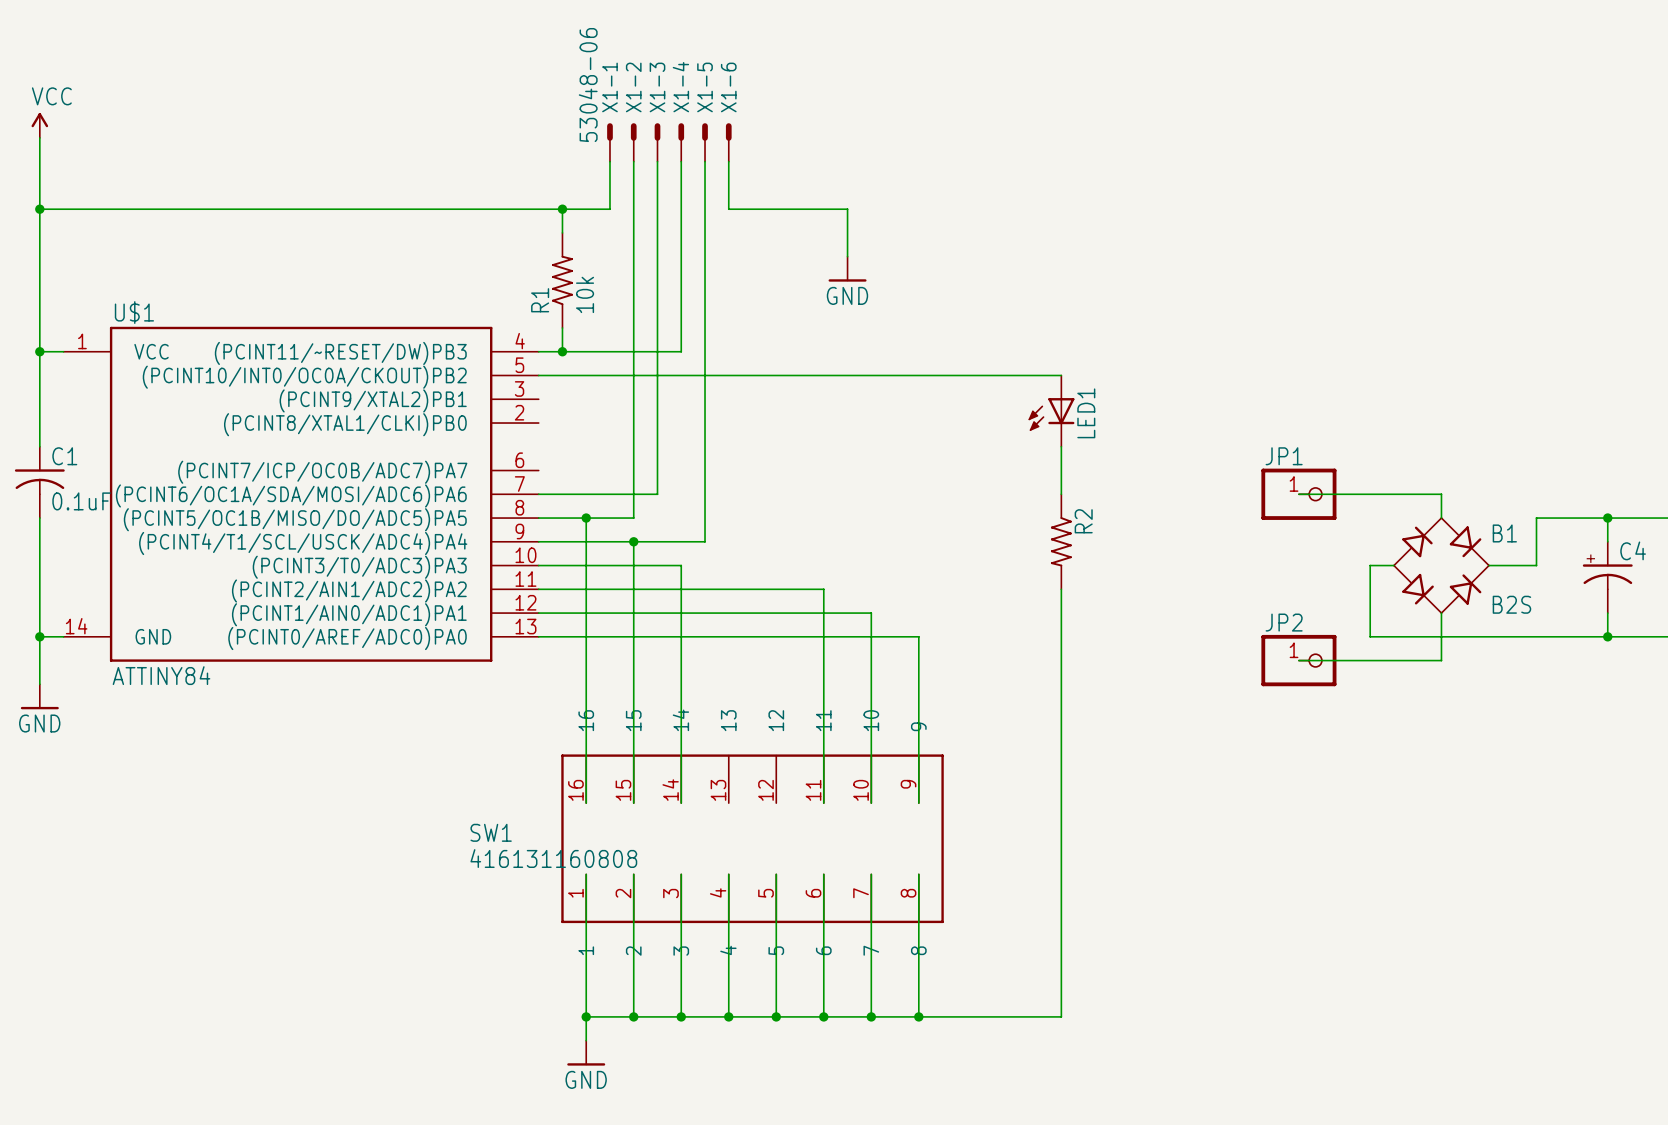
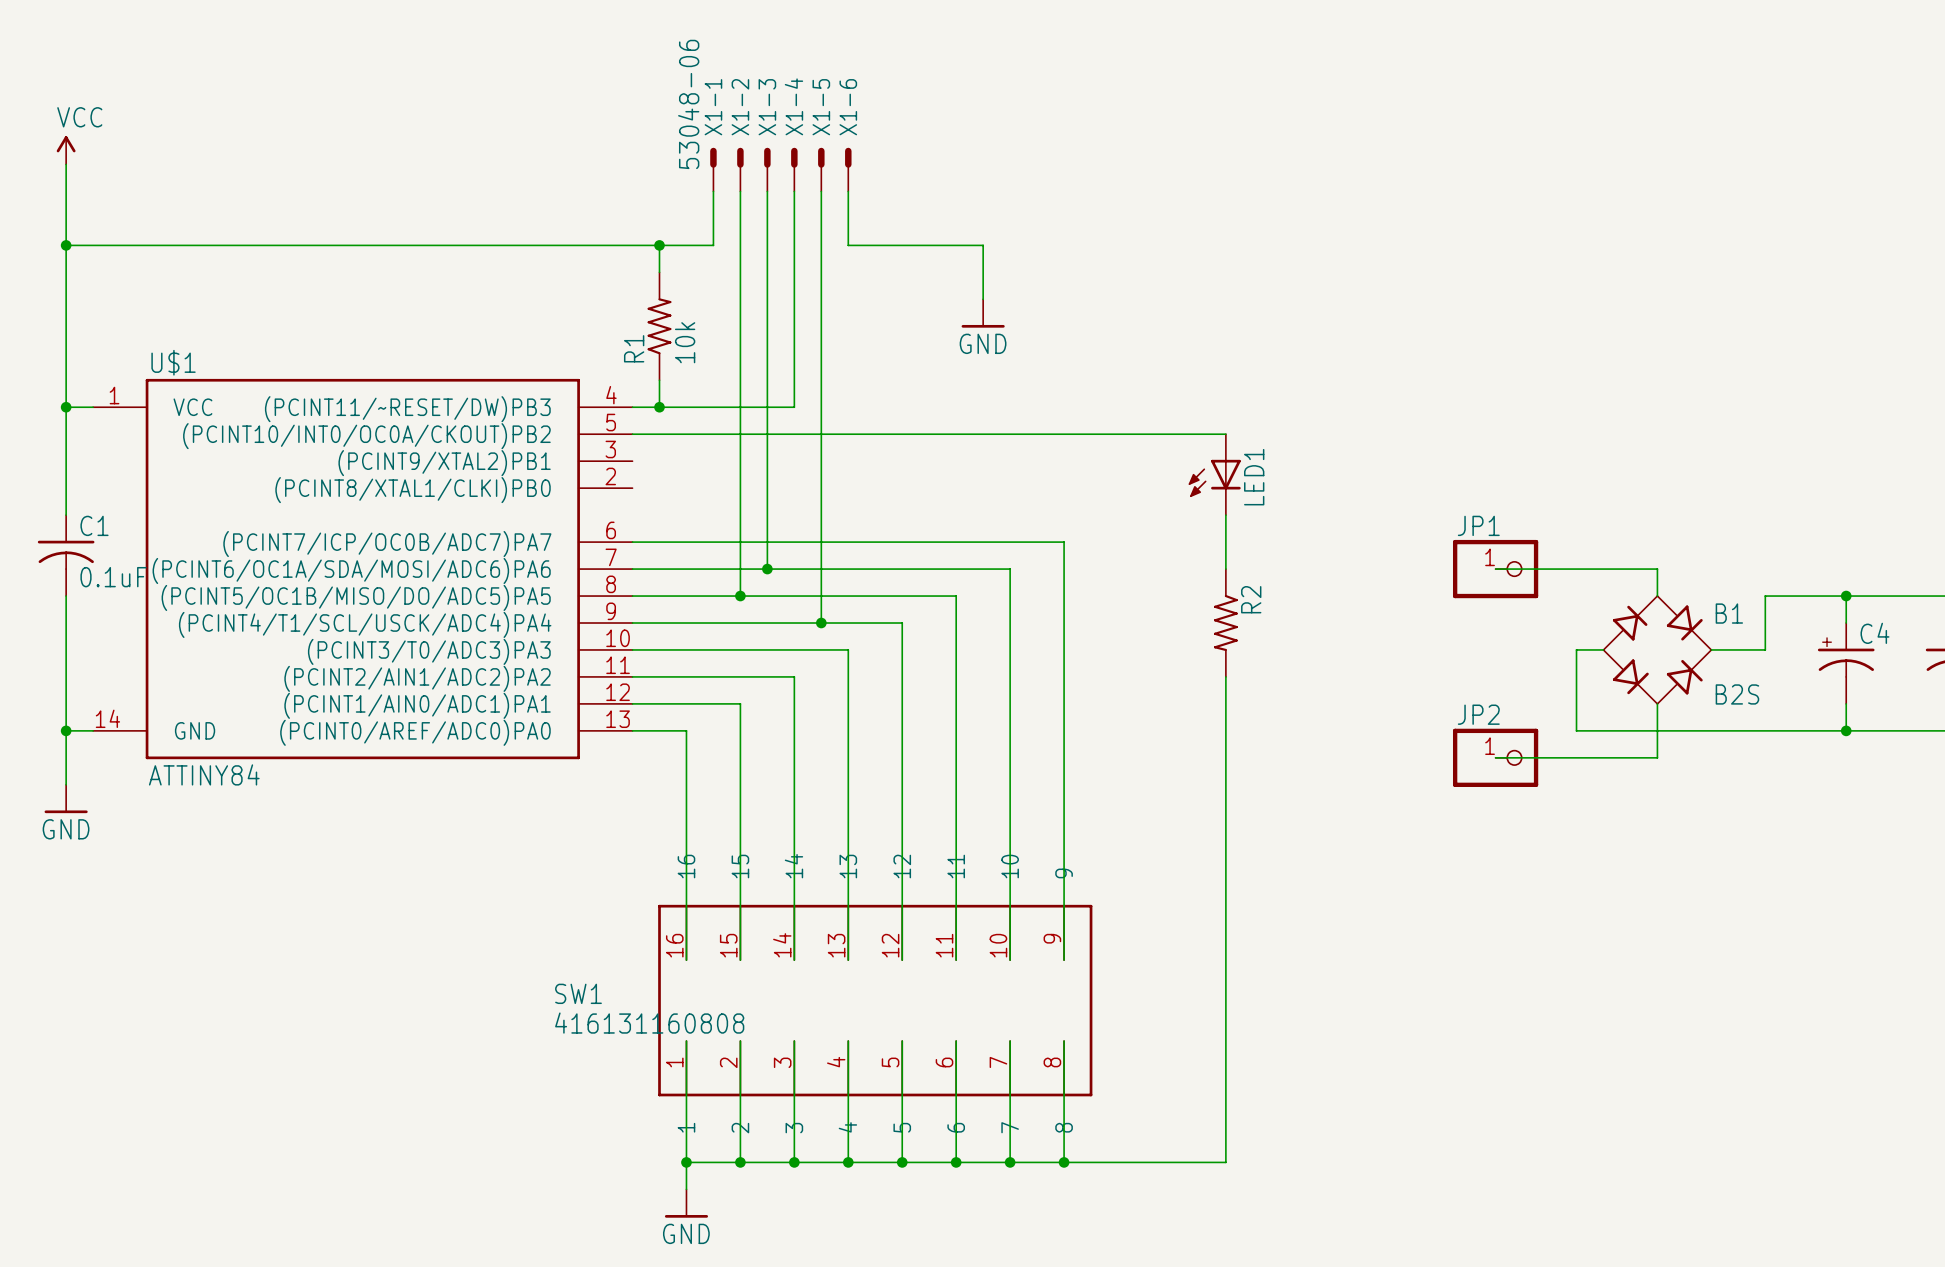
junction: none -> (767, 569)
wire: (586, 518) (586, 636) (918, 636) -> (632, 542) (1064, 542) (1064, 730)
junction: (586, 518) -> none
junction: none -> (740, 596)
wire: (633, 541) (633, 613) (871, 613) -> (767, 569) (1010, 569) (1010, 703)
junction: (633, 541) -> none
wire: none -> (821, 623) (902, 623) (902, 960)
junction: none -> (821, 623)
wire: (681, 565) (681, 589) (823, 589) -> (740, 596) (956, 596) (956, 676)
wire: none -> (794, 649) (848, 649) (848, 960)
SW1 position: (752, 838) -> (875, 1000)
wire: (586, 874) (586, 910) -> (686, 919) (686, 960)
wire: (633, 874) (633, 910) -> (740, 919) (740, 960)
wire: (681, 874) (681, 910) -> (794, 919) (794, 960)
wire: (728, 874) (728, 910) -> none
wire: (776, 874) (776, 910) -> none
wire: (823, 874) (823, 910) -> (956, 919) (956, 960)
wire: (871, 874) (871, 910) -> (1010, 919) (1010, 960)
wire: (918, 874) (918, 910) -> (1064, 919) (1064, 960)

